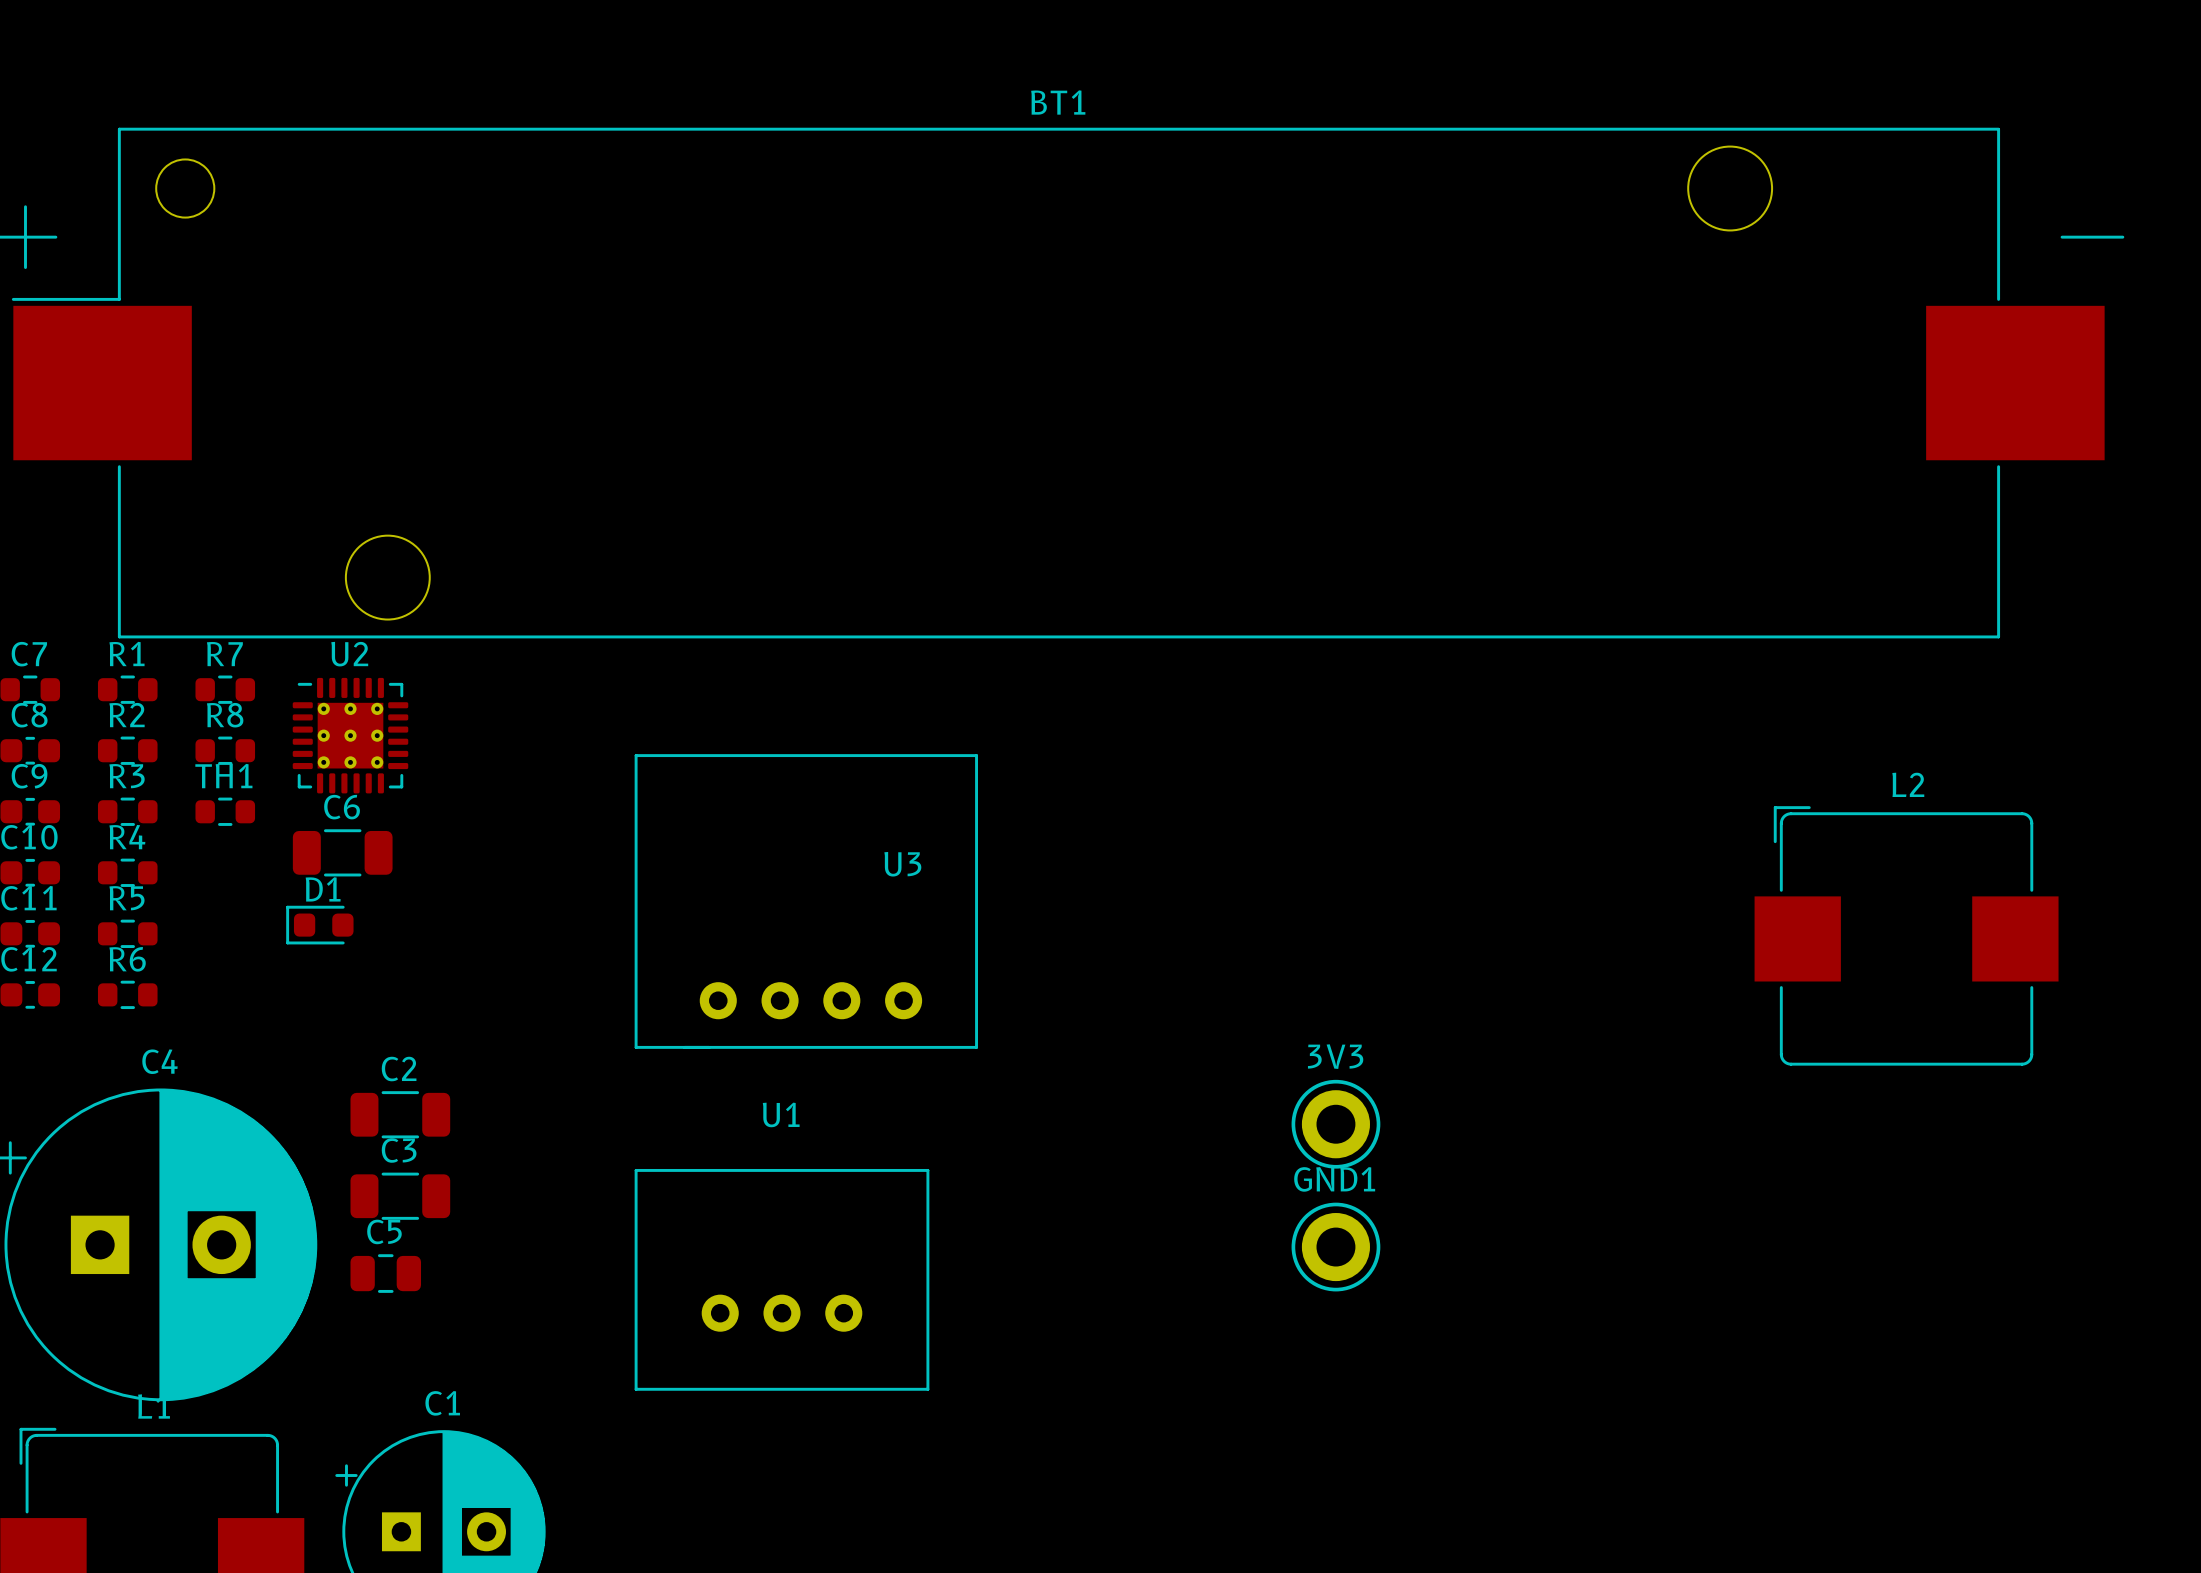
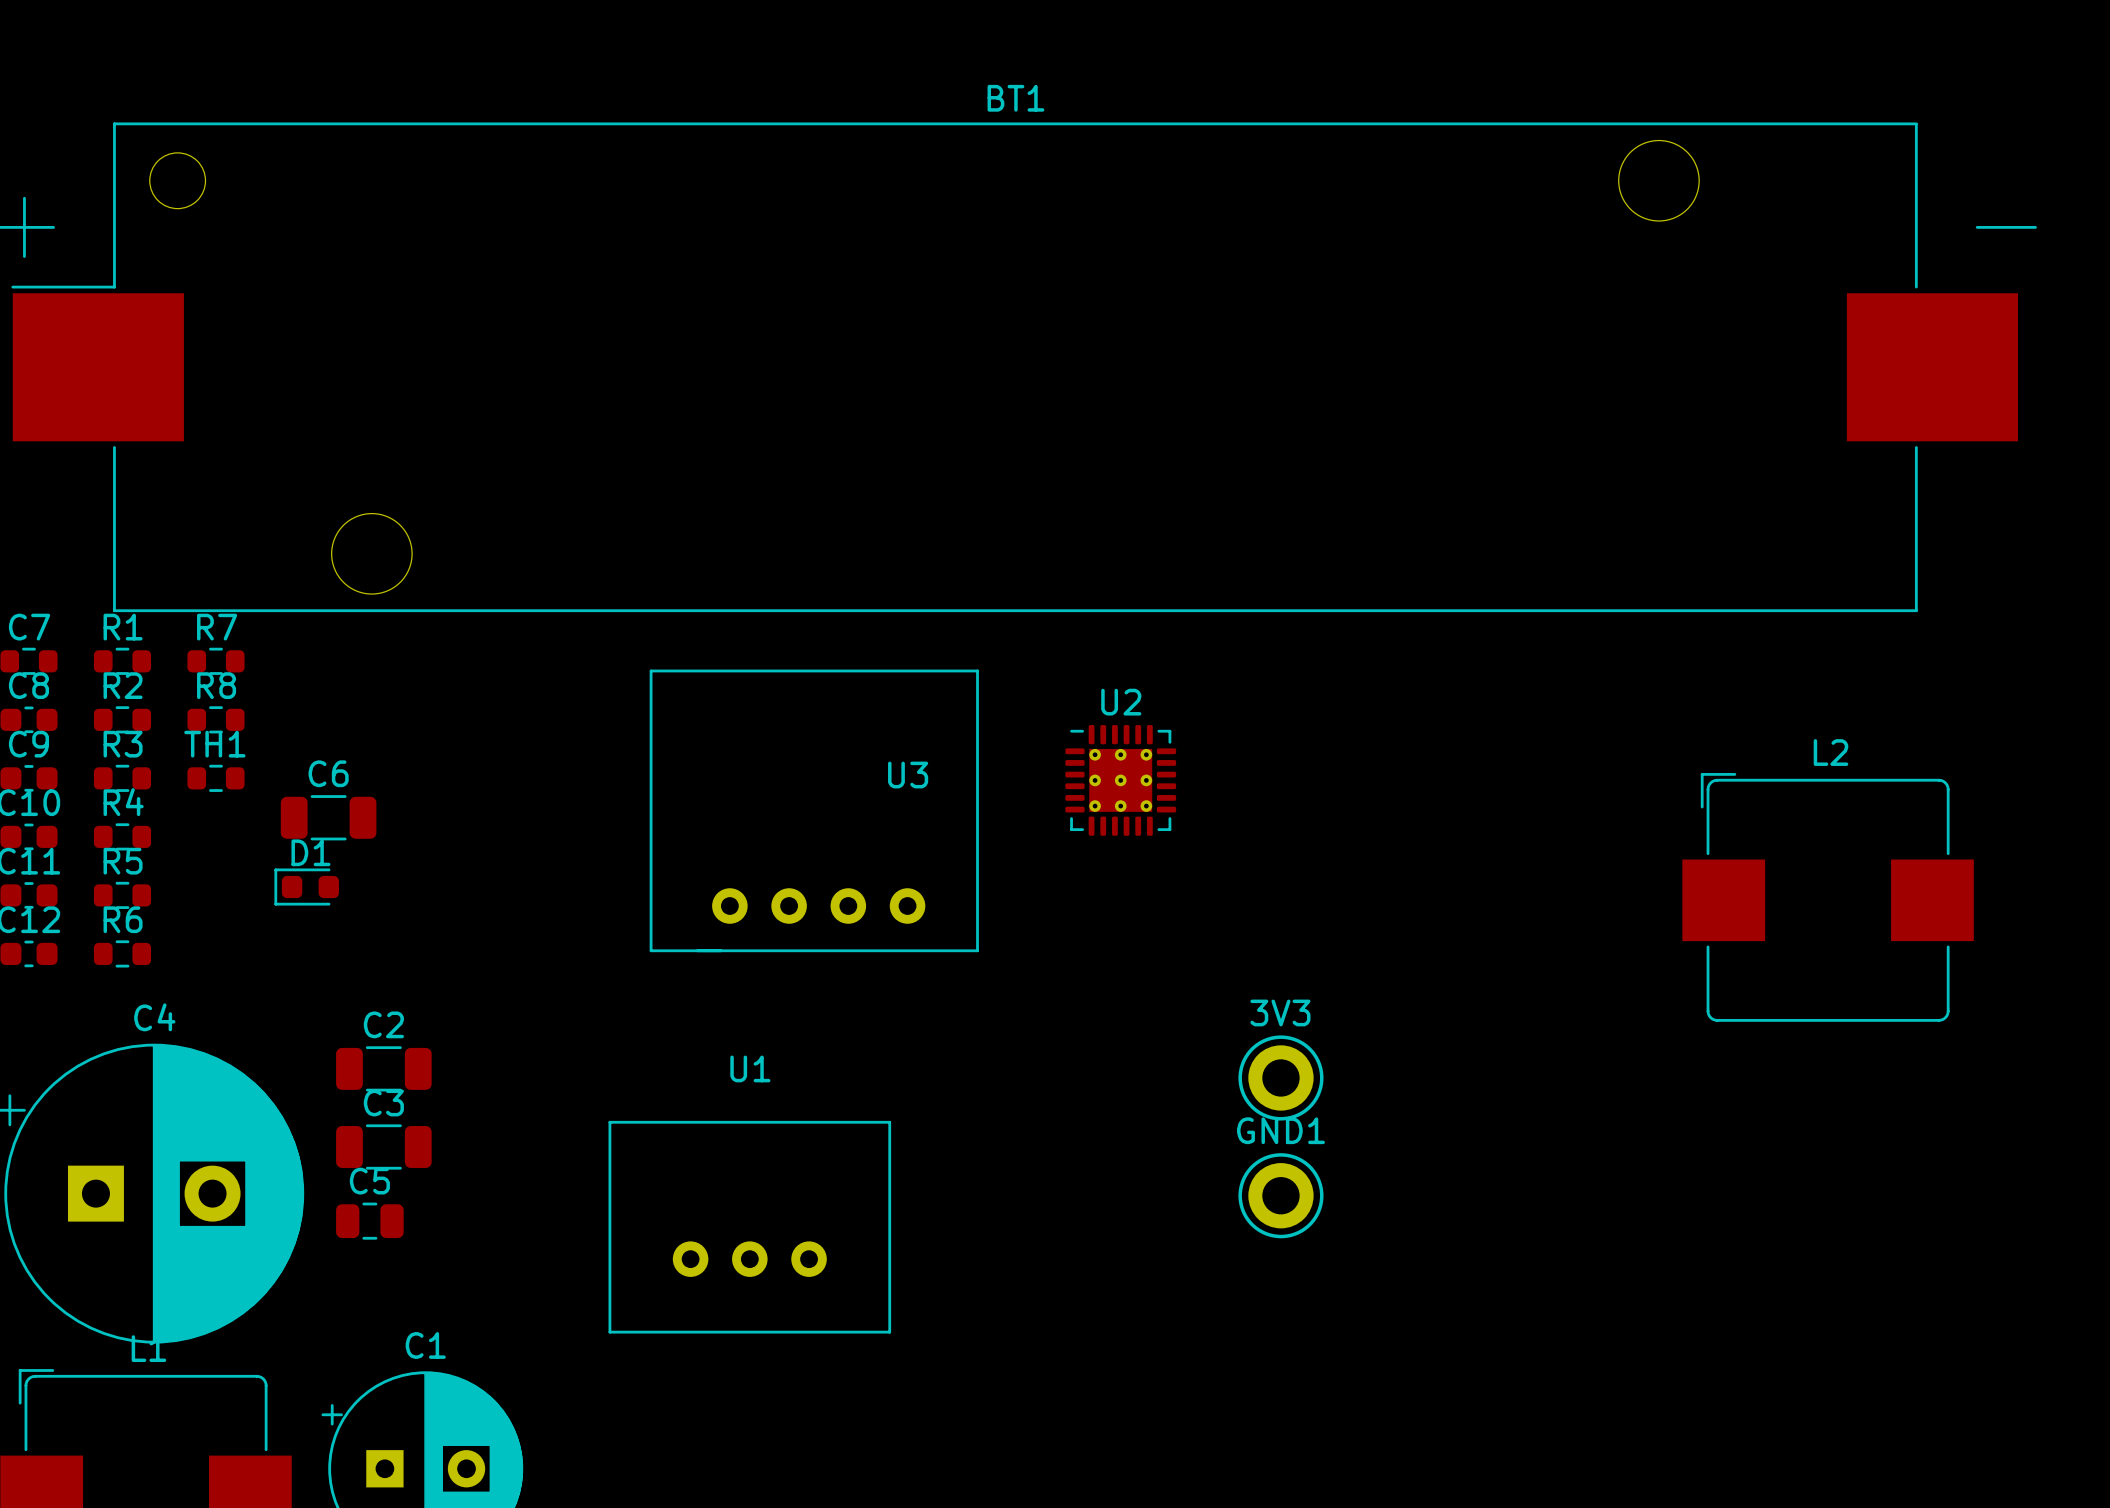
U2 position: (350, 735) -> (1120, 780)
U3 position: (806, 901) -> (814, 810)

